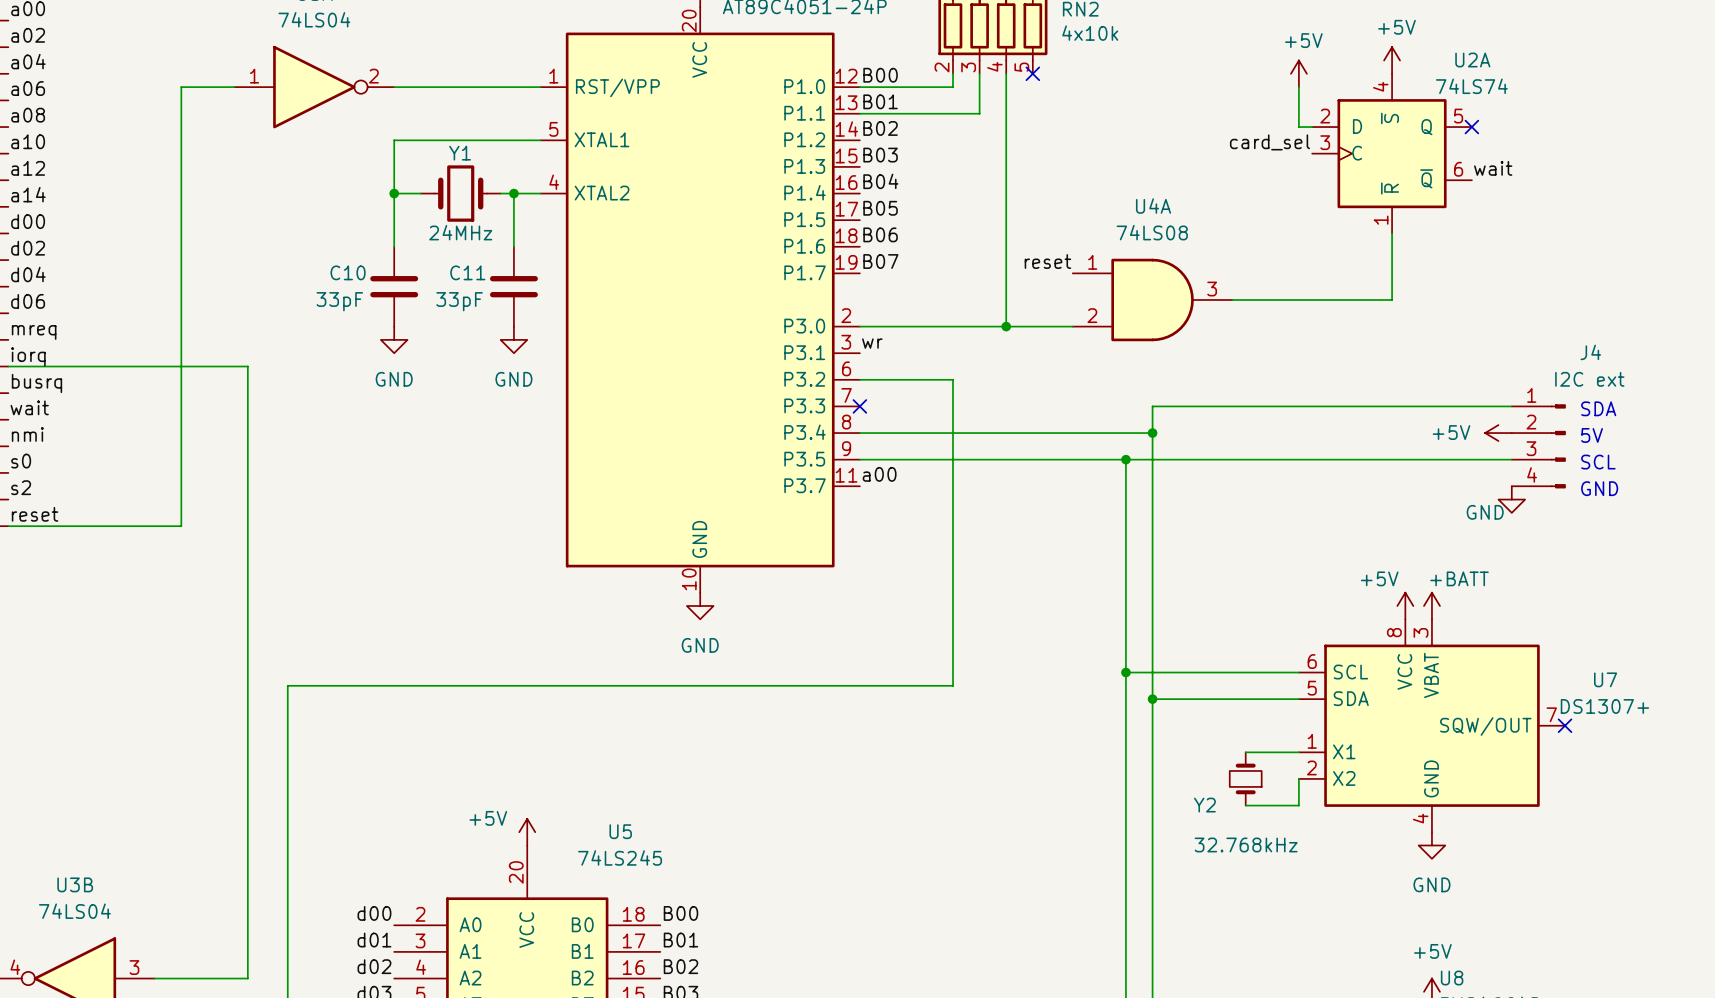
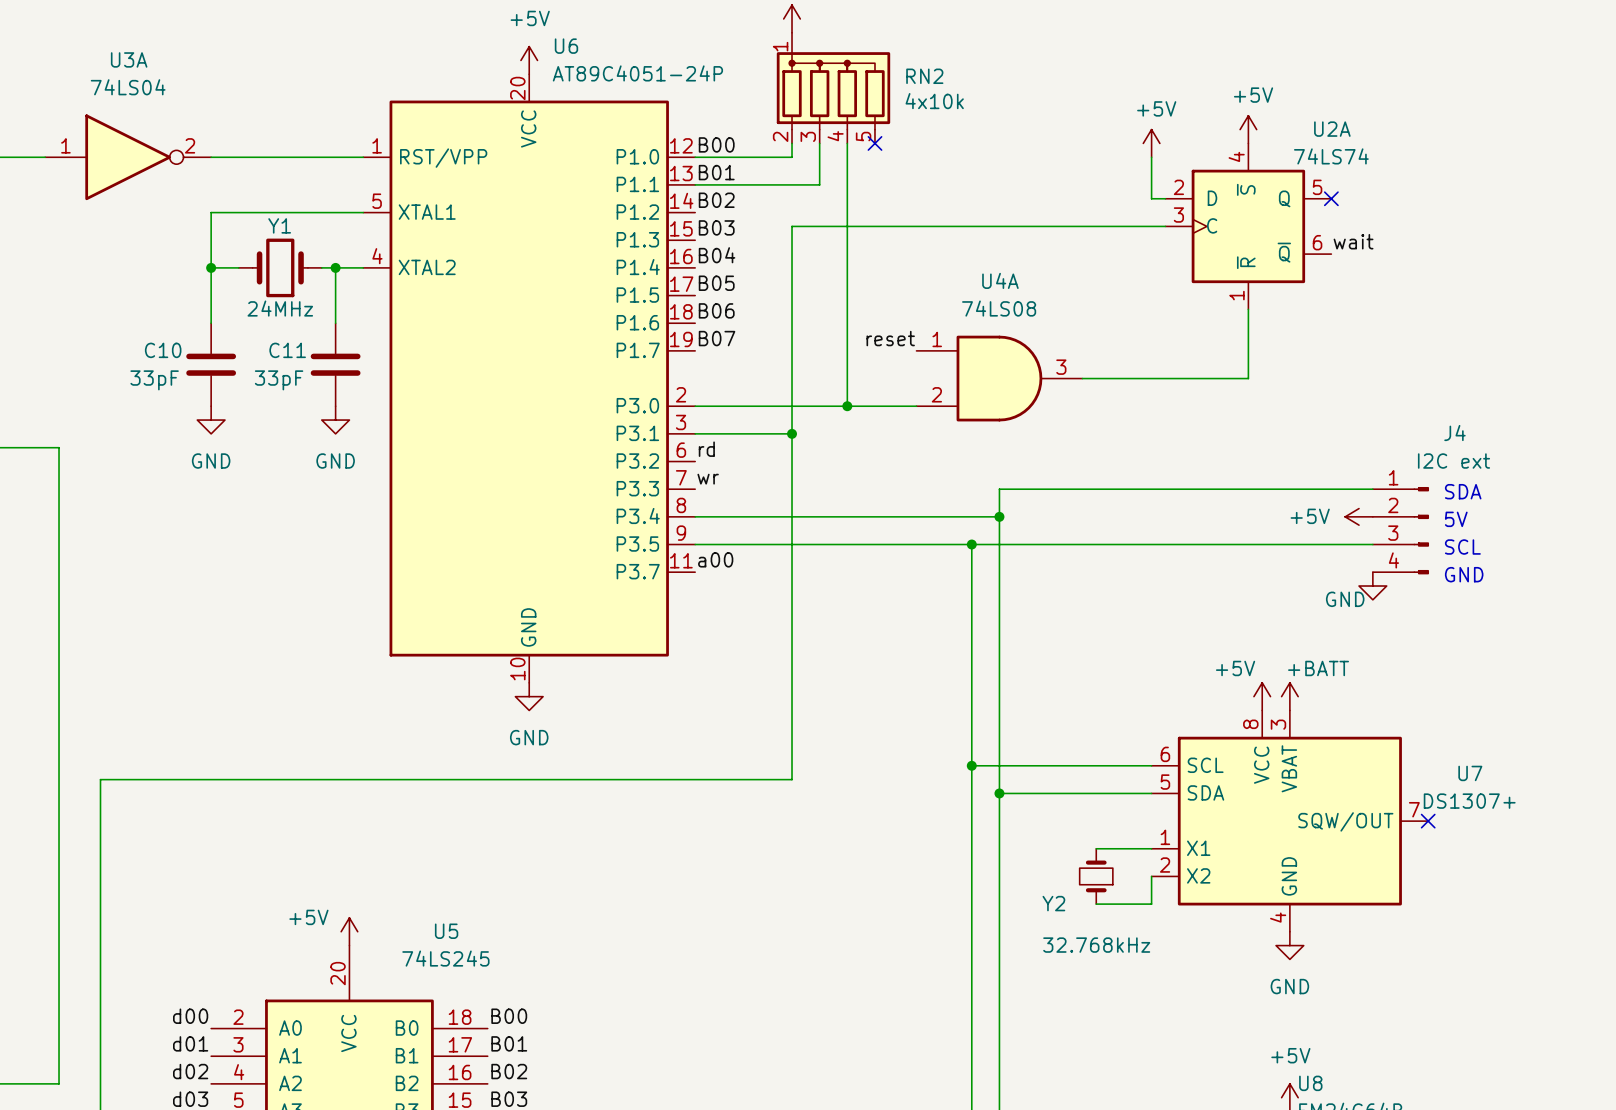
label: card_sel (1269, 142) -> none
label position: wr (872, 343) -> wr (708, 479)
wire: none -> (695, 433) (792, 433)
junction: none -> (792, 433)
label: none -> rd (706, 449)
wire: (859, 379) (953, 379) -> (1165, 226) (792, 226) (792, 461)
no-connect mark: (859, 406) -> none

